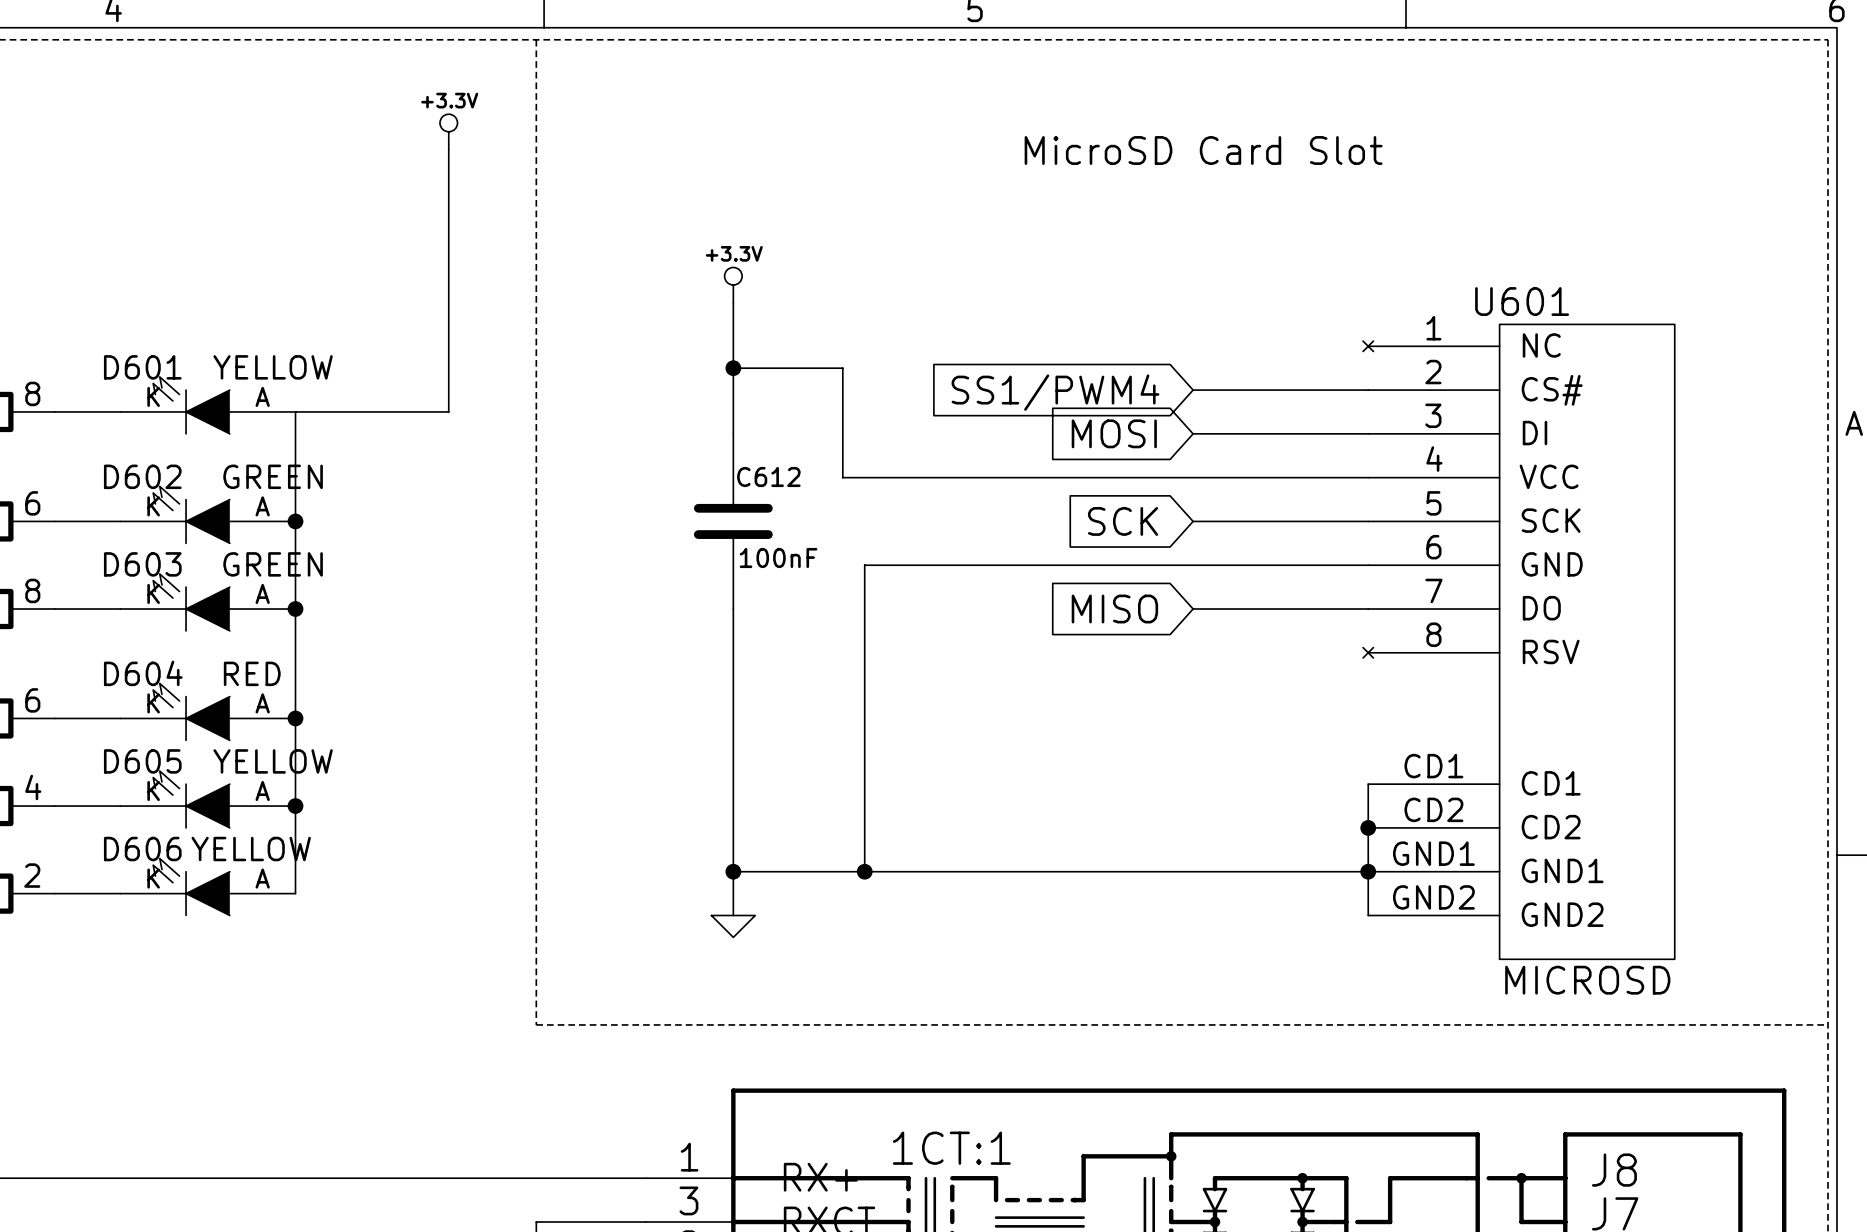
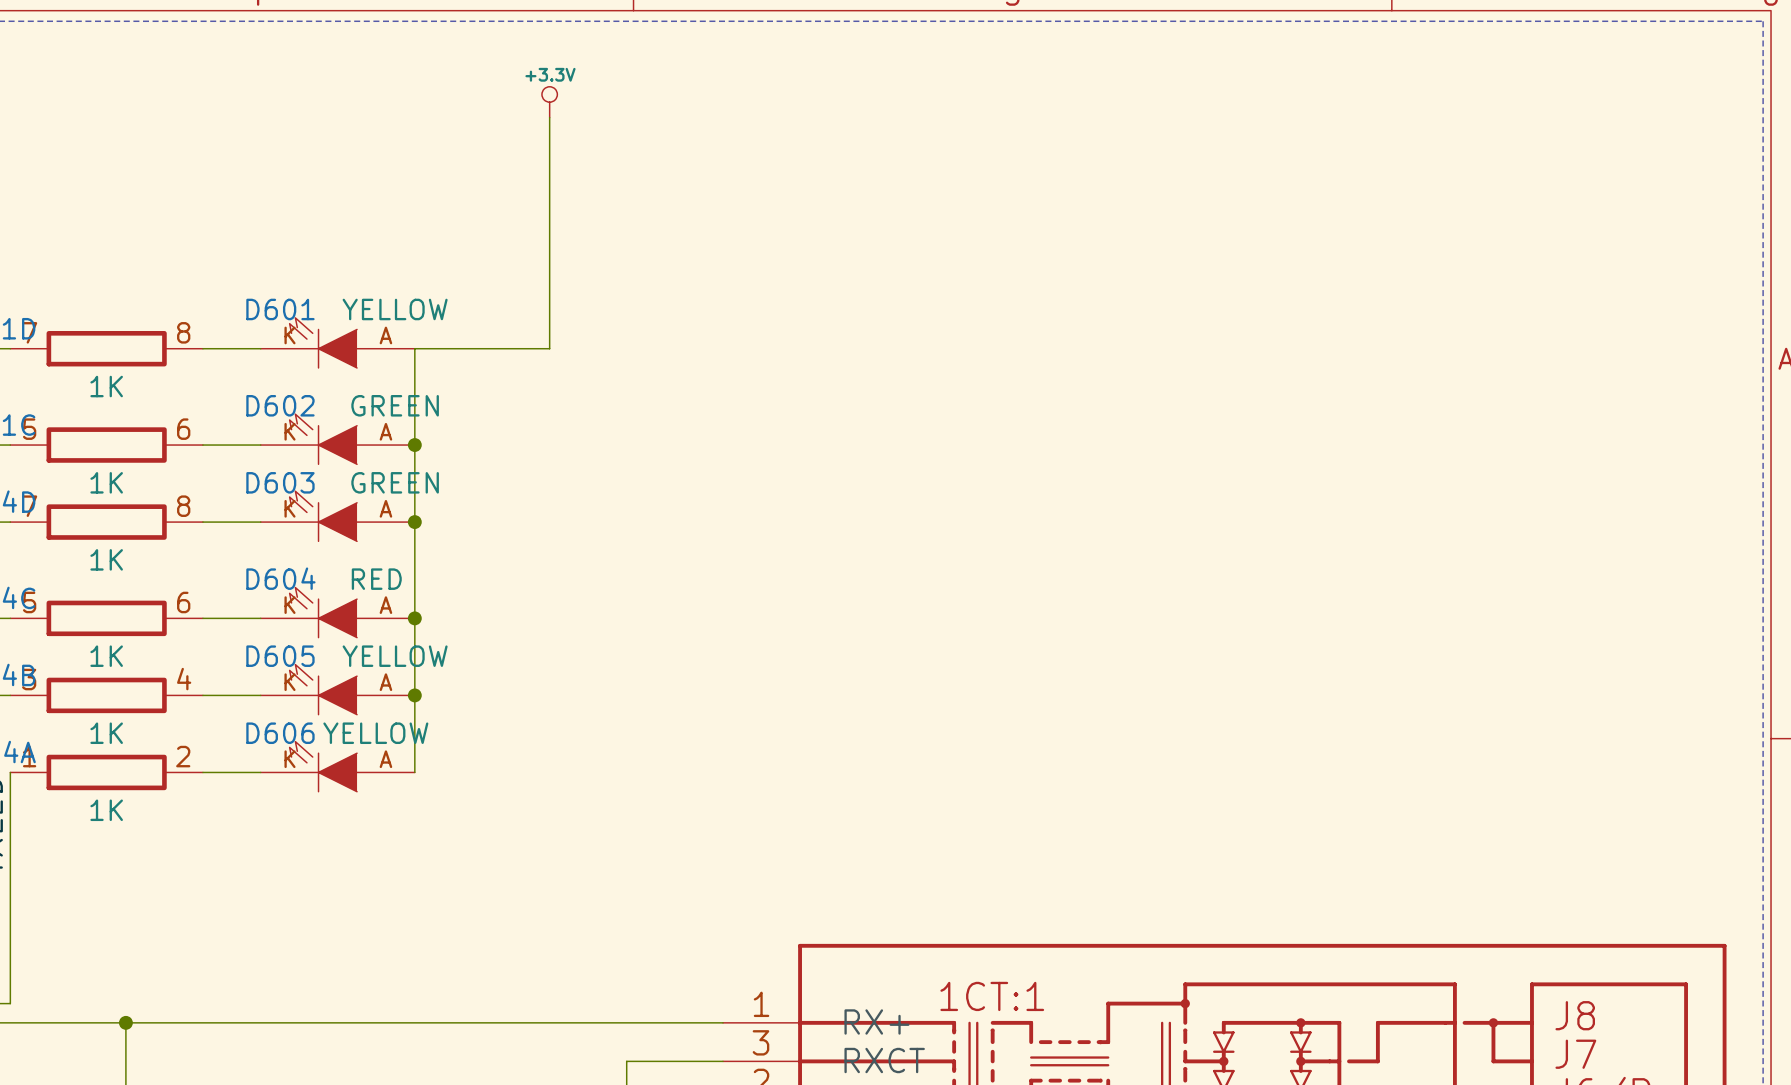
line: (536, 39) (536, 1024) (1827, 1024) -> none
text: MicroSD Card Slot (1203, 150) -> none
power symbol: +3.3V (733, 284) -> none
wire: (733, 302) (733, 433) -> none
wire: (733, 368) (842, 368) (842, 477) (1368, 477) -> none
junction: (733, 368) -> none
wire: (1193, 390) (1368, 390) -> none
global label: SS1/PWM4 (1055, 392) -> none
global label: MOSI (1114, 433) -> none
wire: (1193, 433) (1368, 433) -> none
C612: 100nF (733, 521) -> none
global label: SCK (1123, 521) -> none
wire: (1193, 521) (1368, 521) -> none
wire: (1368, 565) (864, 565) (864, 871) -> none
wire: (733, 609) (733, 915) -> none
global label: MISO (1114, 609) -> none
wire: (1193, 609) (1368, 609) -> none
U601: MICROSD (1518, 641) -> none
wire: (1368, 784) (1368, 915) -> none
junction: (1368, 827) -> none
wire: (733, 871) (1368, 871) -> none
junction: (733, 871) -> none
junction: (864, 871) -> none
junction: (1368, 871) -> none
power symbol: (733, 926) -> none

